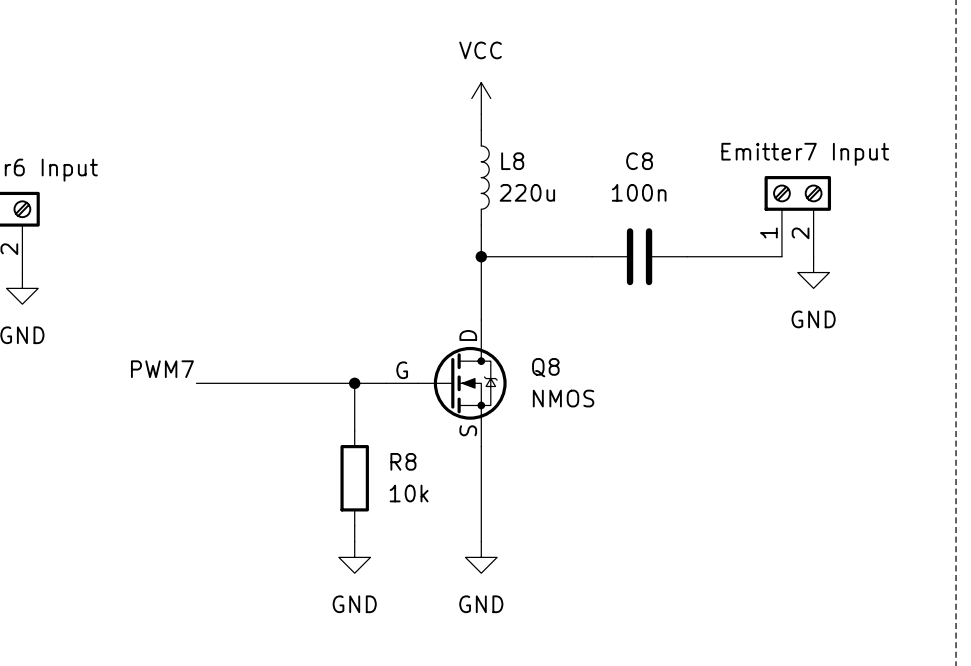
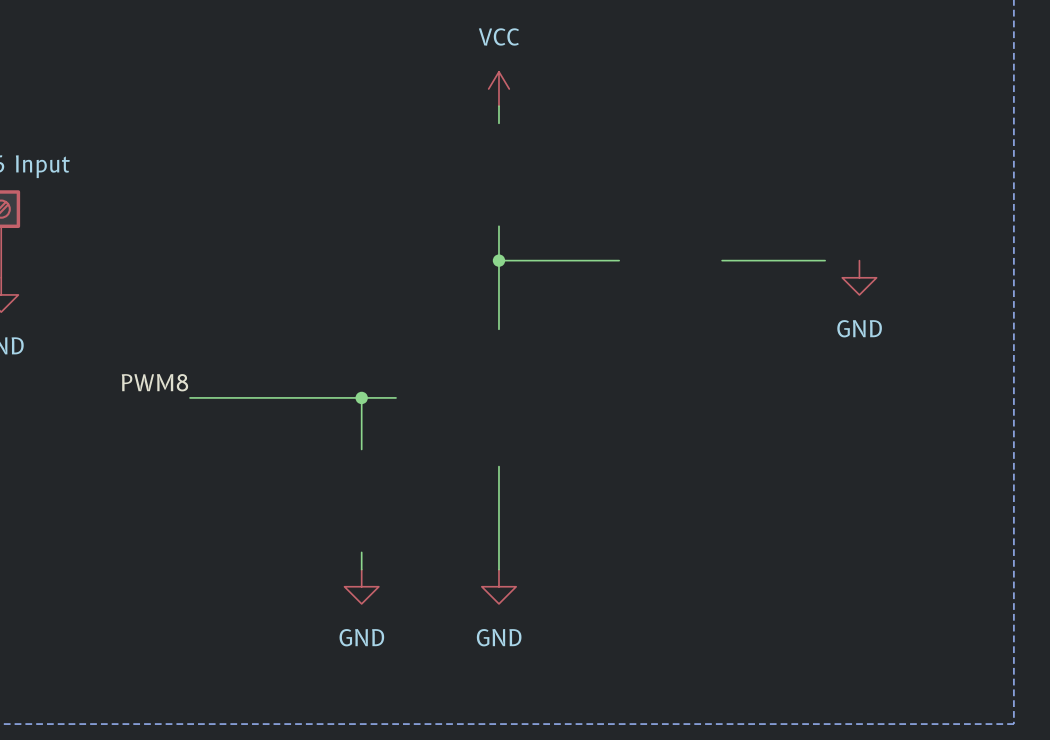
L8: 220u (485, 177) -> none
part: Emitter7 Input (797, 216) -> none
C8: 100n (639, 256) -> none
label: PWM7 (162, 369) -> PWM8 (154, 382)
Q8: NMOS (446, 383) -> none
R8: 10k (354, 478) -> none

